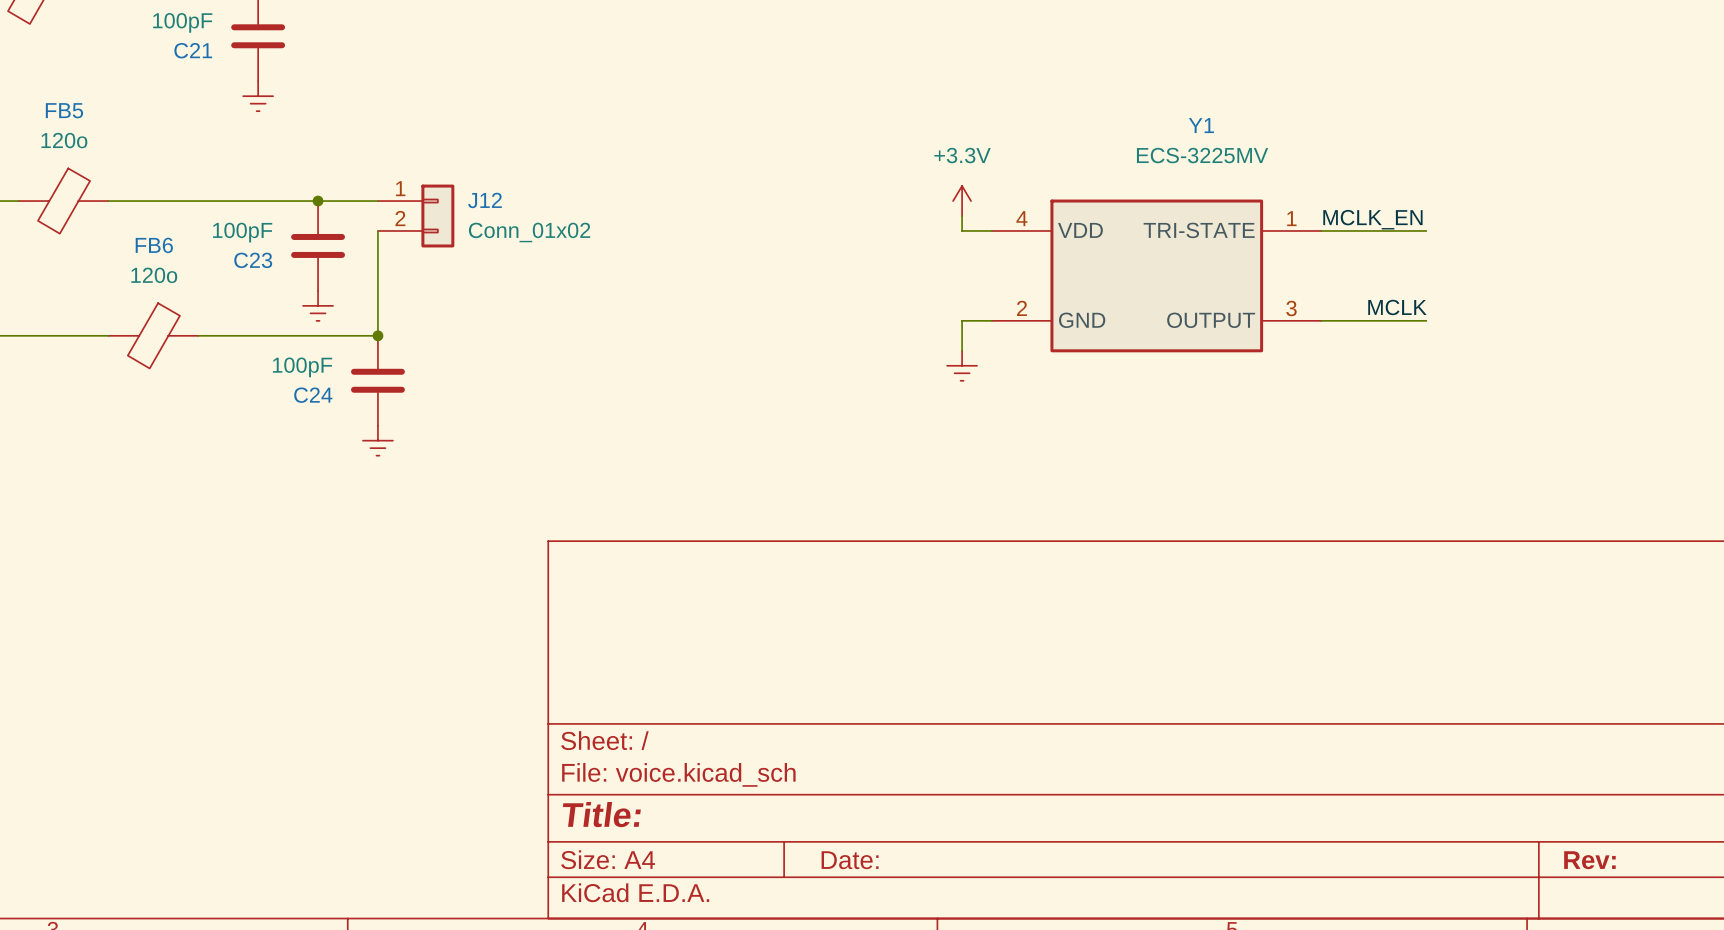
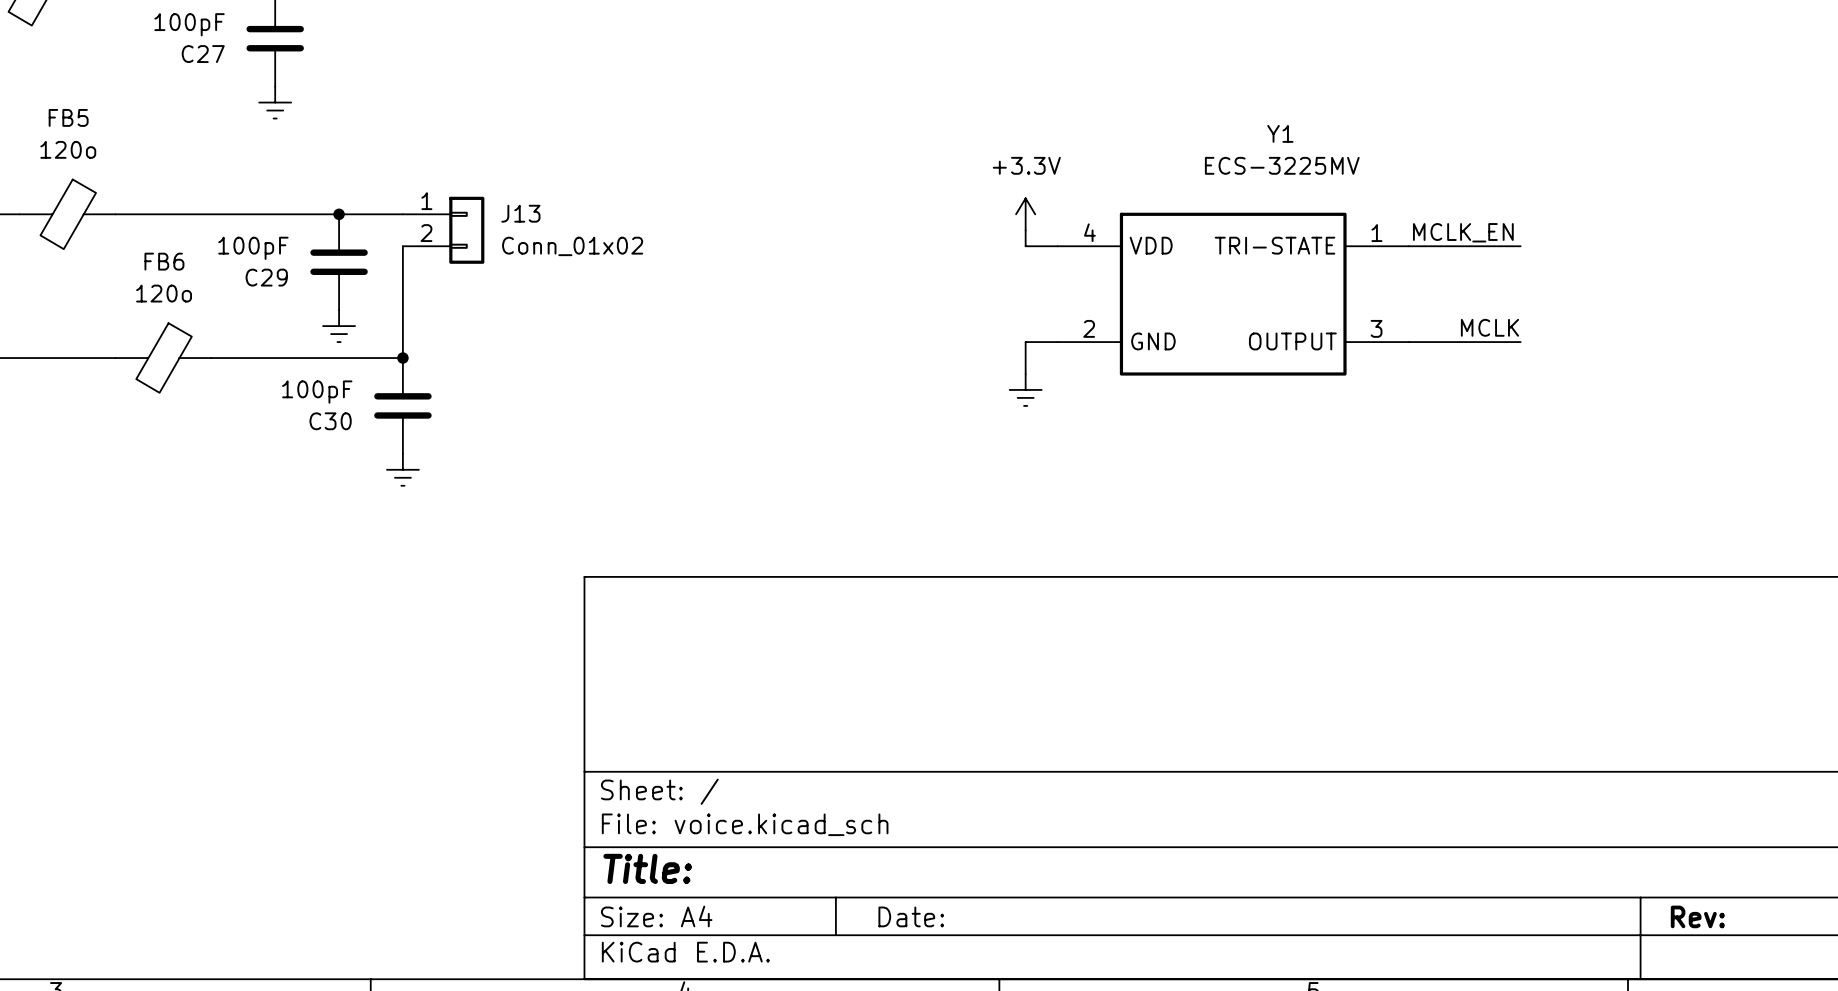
C21 name: C21 (193, 50) -> C27 (203, 54)
J12 name: J12 (484, 200) -> J13 (520, 213)
C23 name: C23 (253, 260) -> C29 (266, 277)
C24 name: C24 (313, 395) -> C30 (330, 421)

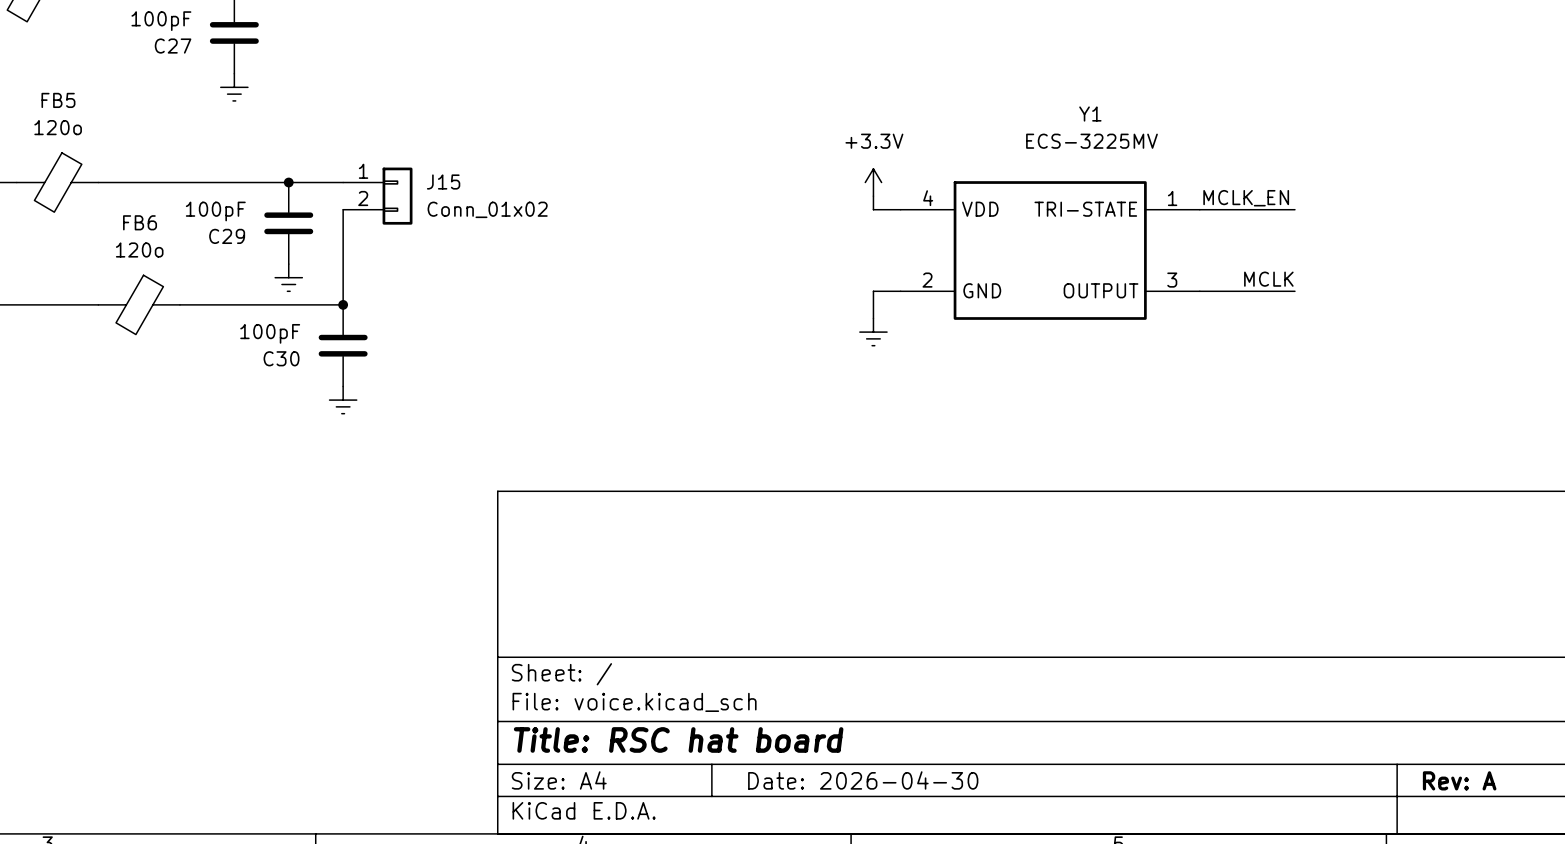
J13 name: J13 (520, 213) -> J15 (443, 182)
title block: Title: (647, 868) -> Title: RSC hat board (678, 739)
title block: Date: (911, 916) -> Date: 2026-04-30 (863, 780)
title block: Rev: (1697, 916) -> Rev: A (1459, 780)

